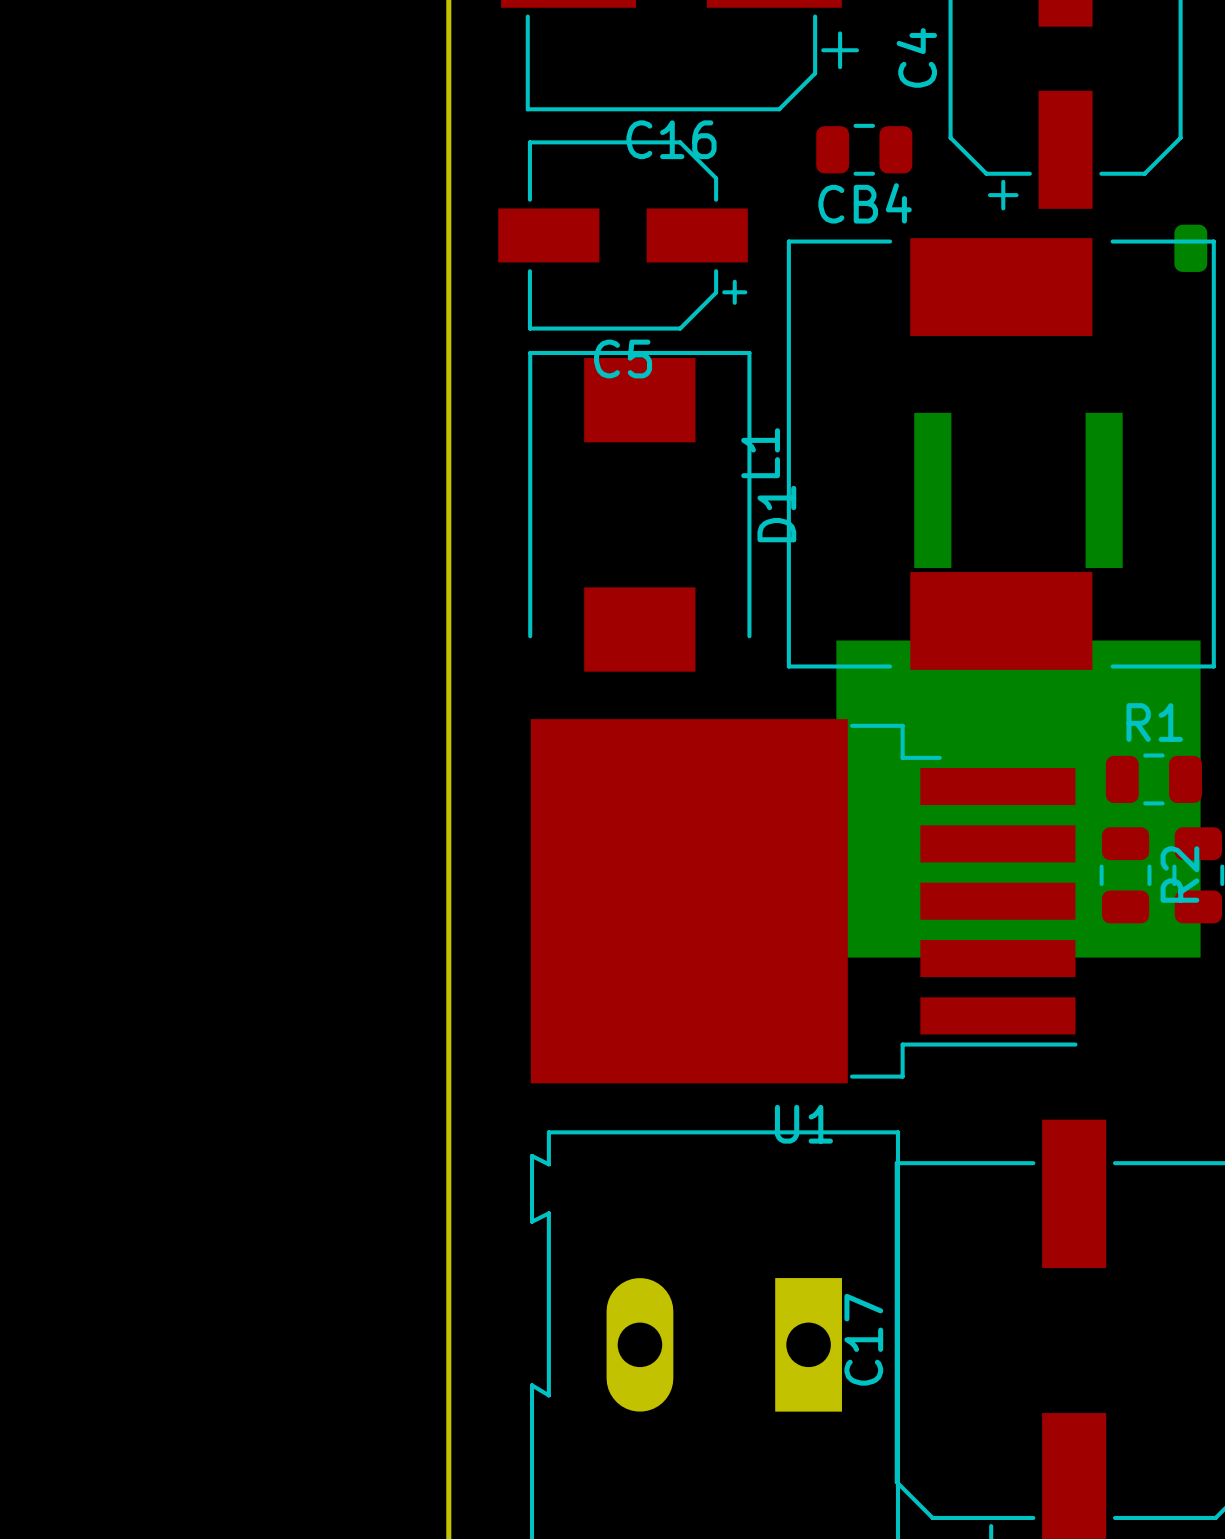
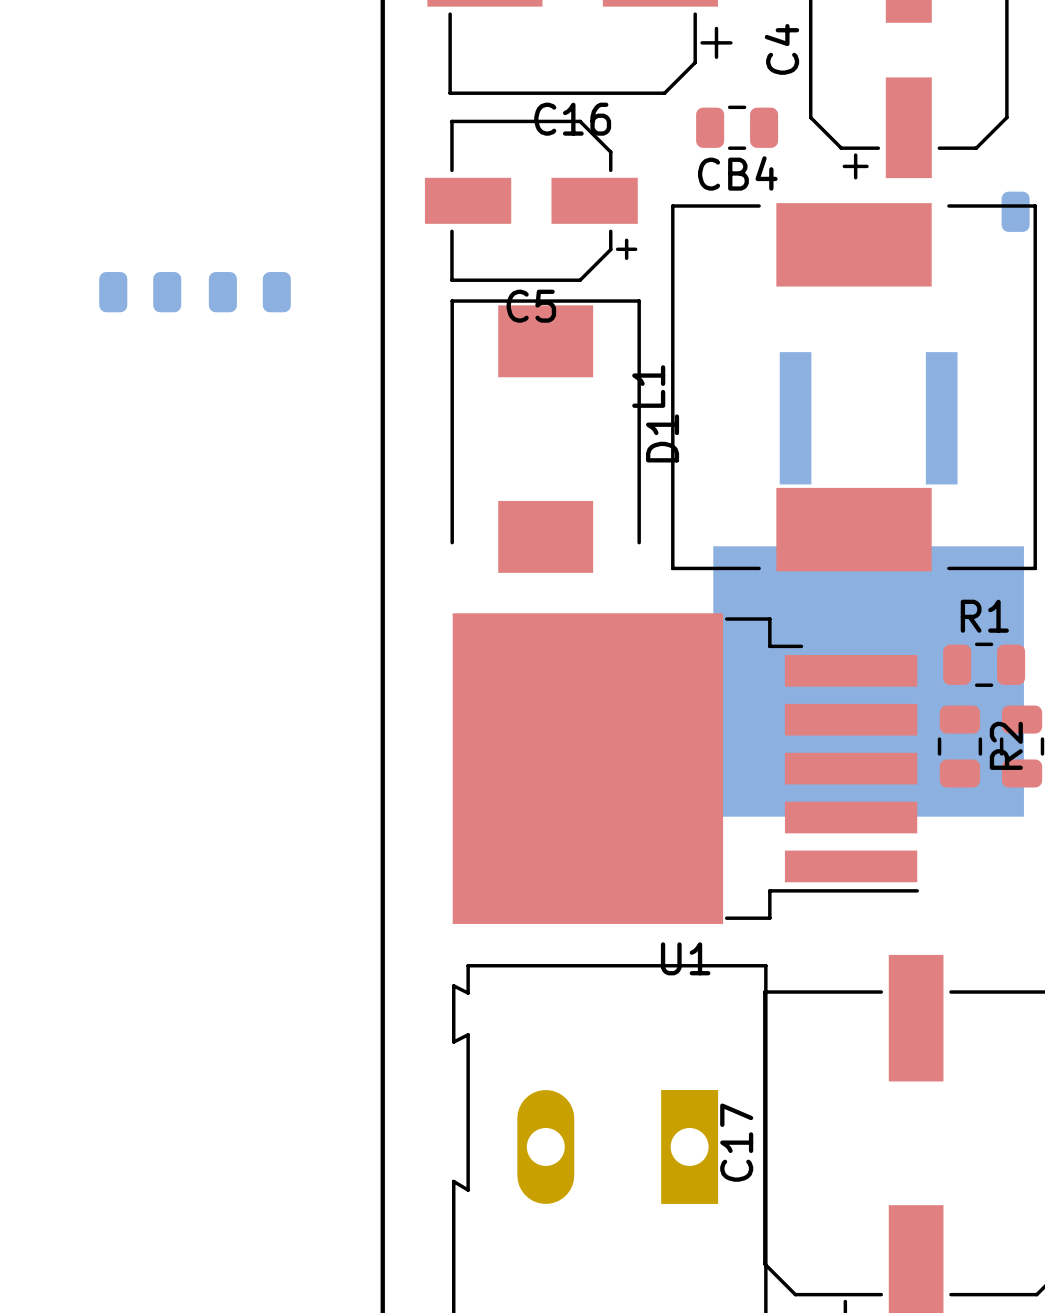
part: none -> (140, 292)
part: none -> (249, 292)

